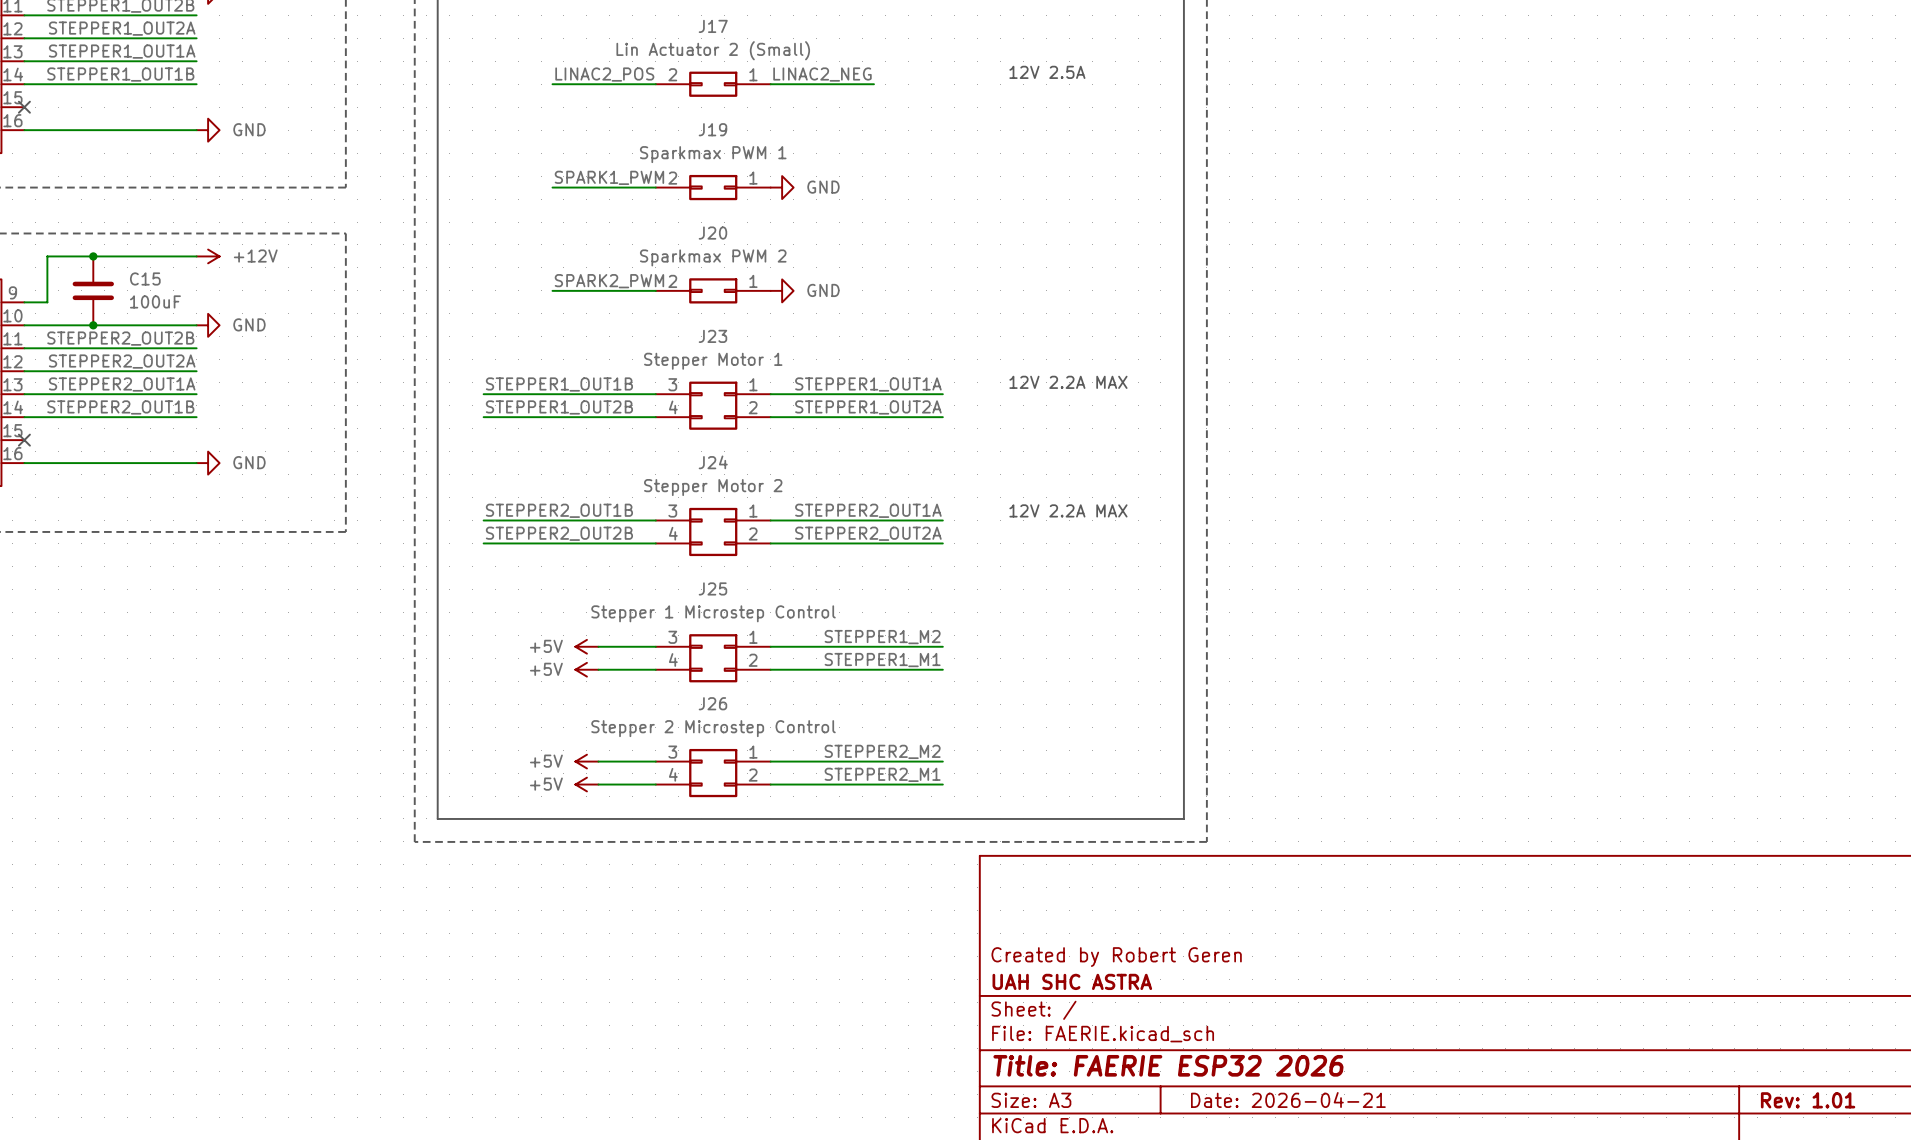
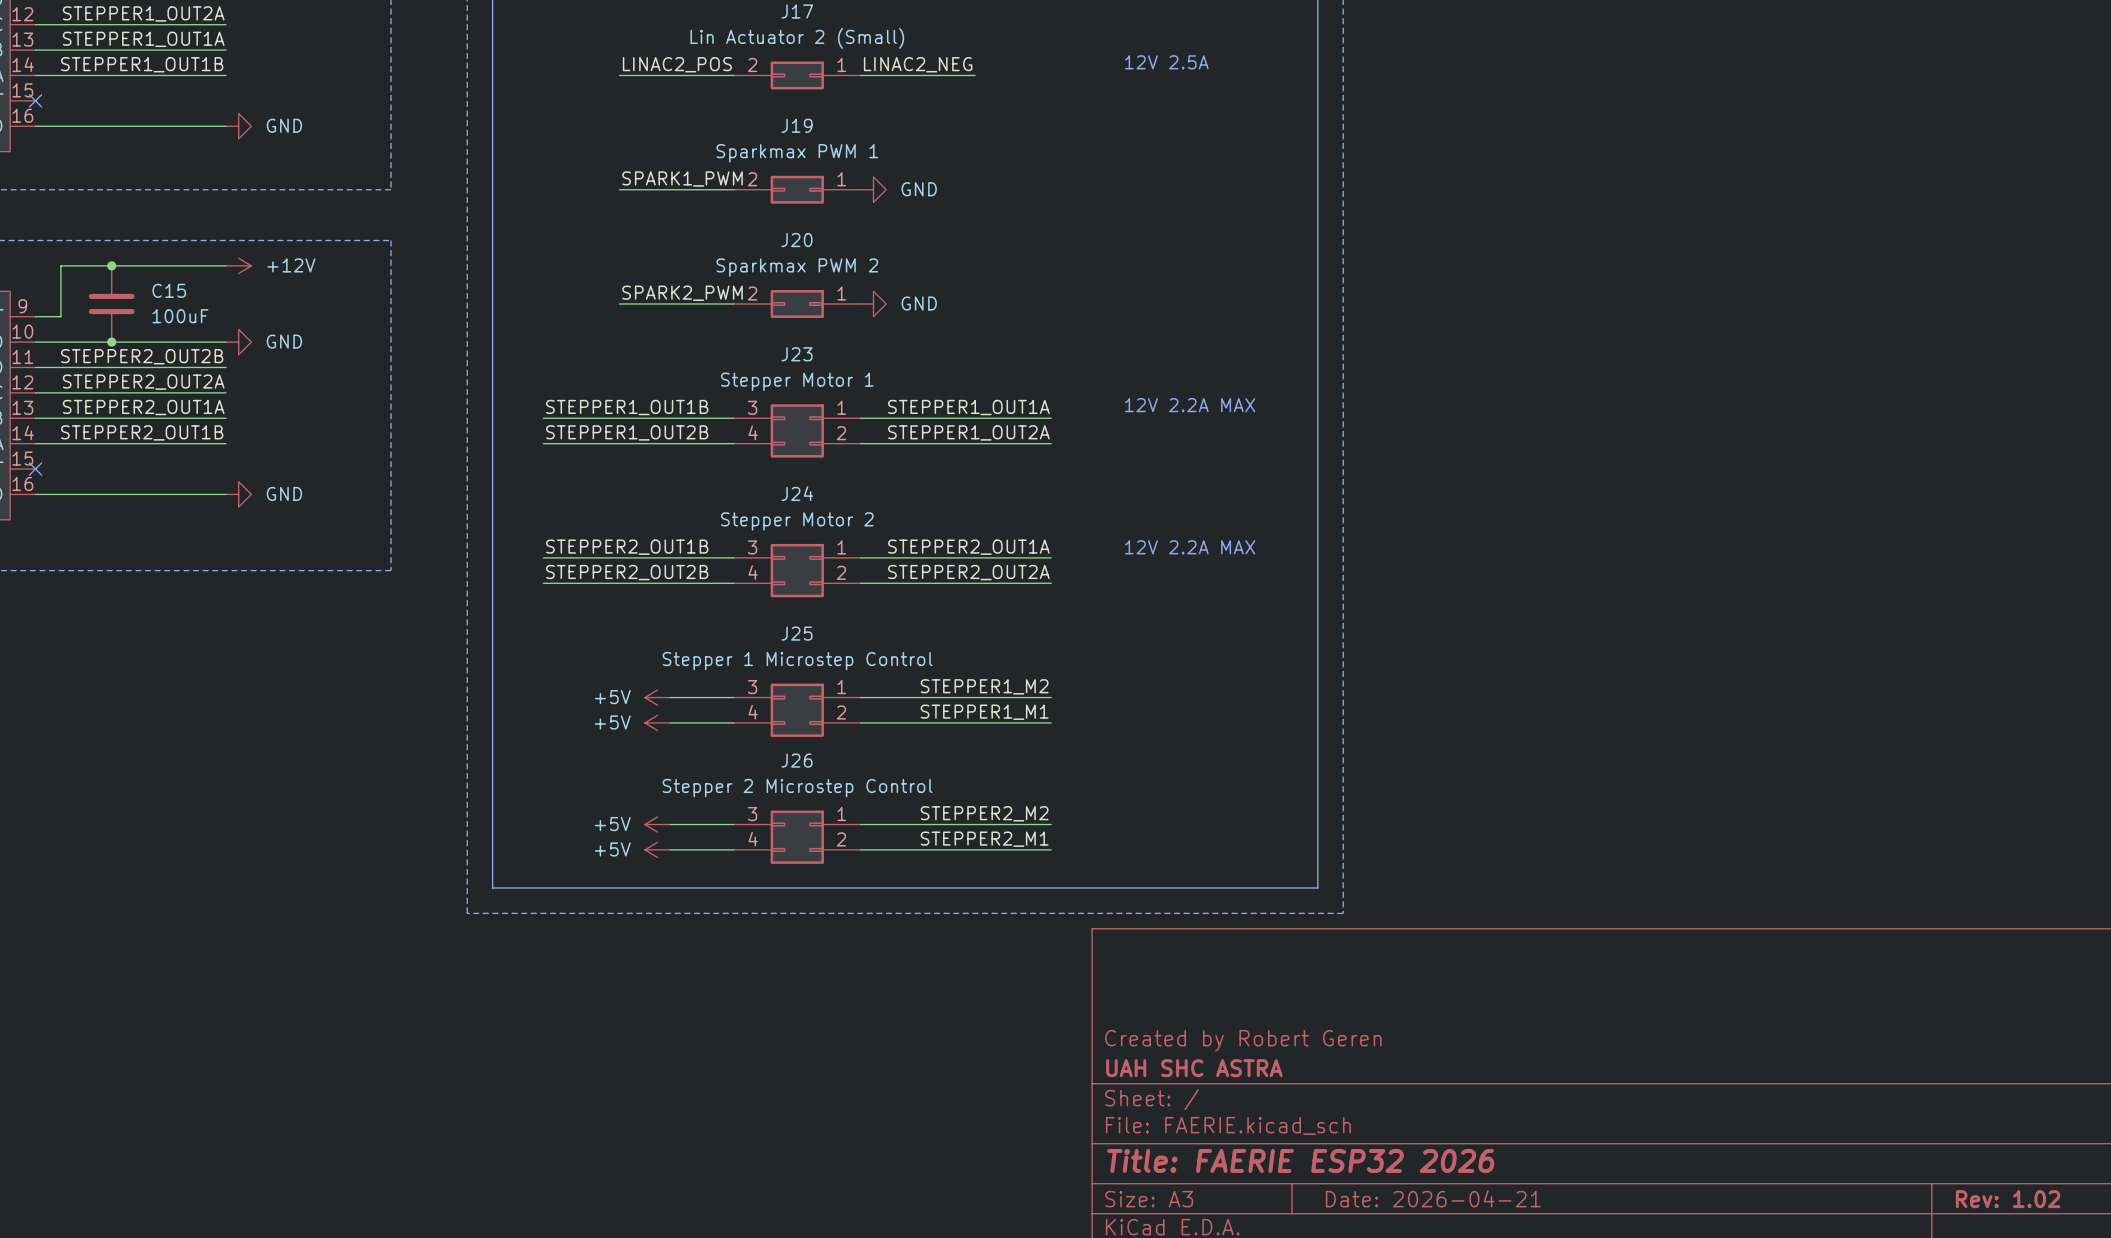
title block: Rev: 1.01 (1808, 1100) -> Rev: 1.02 (2008, 1199)

